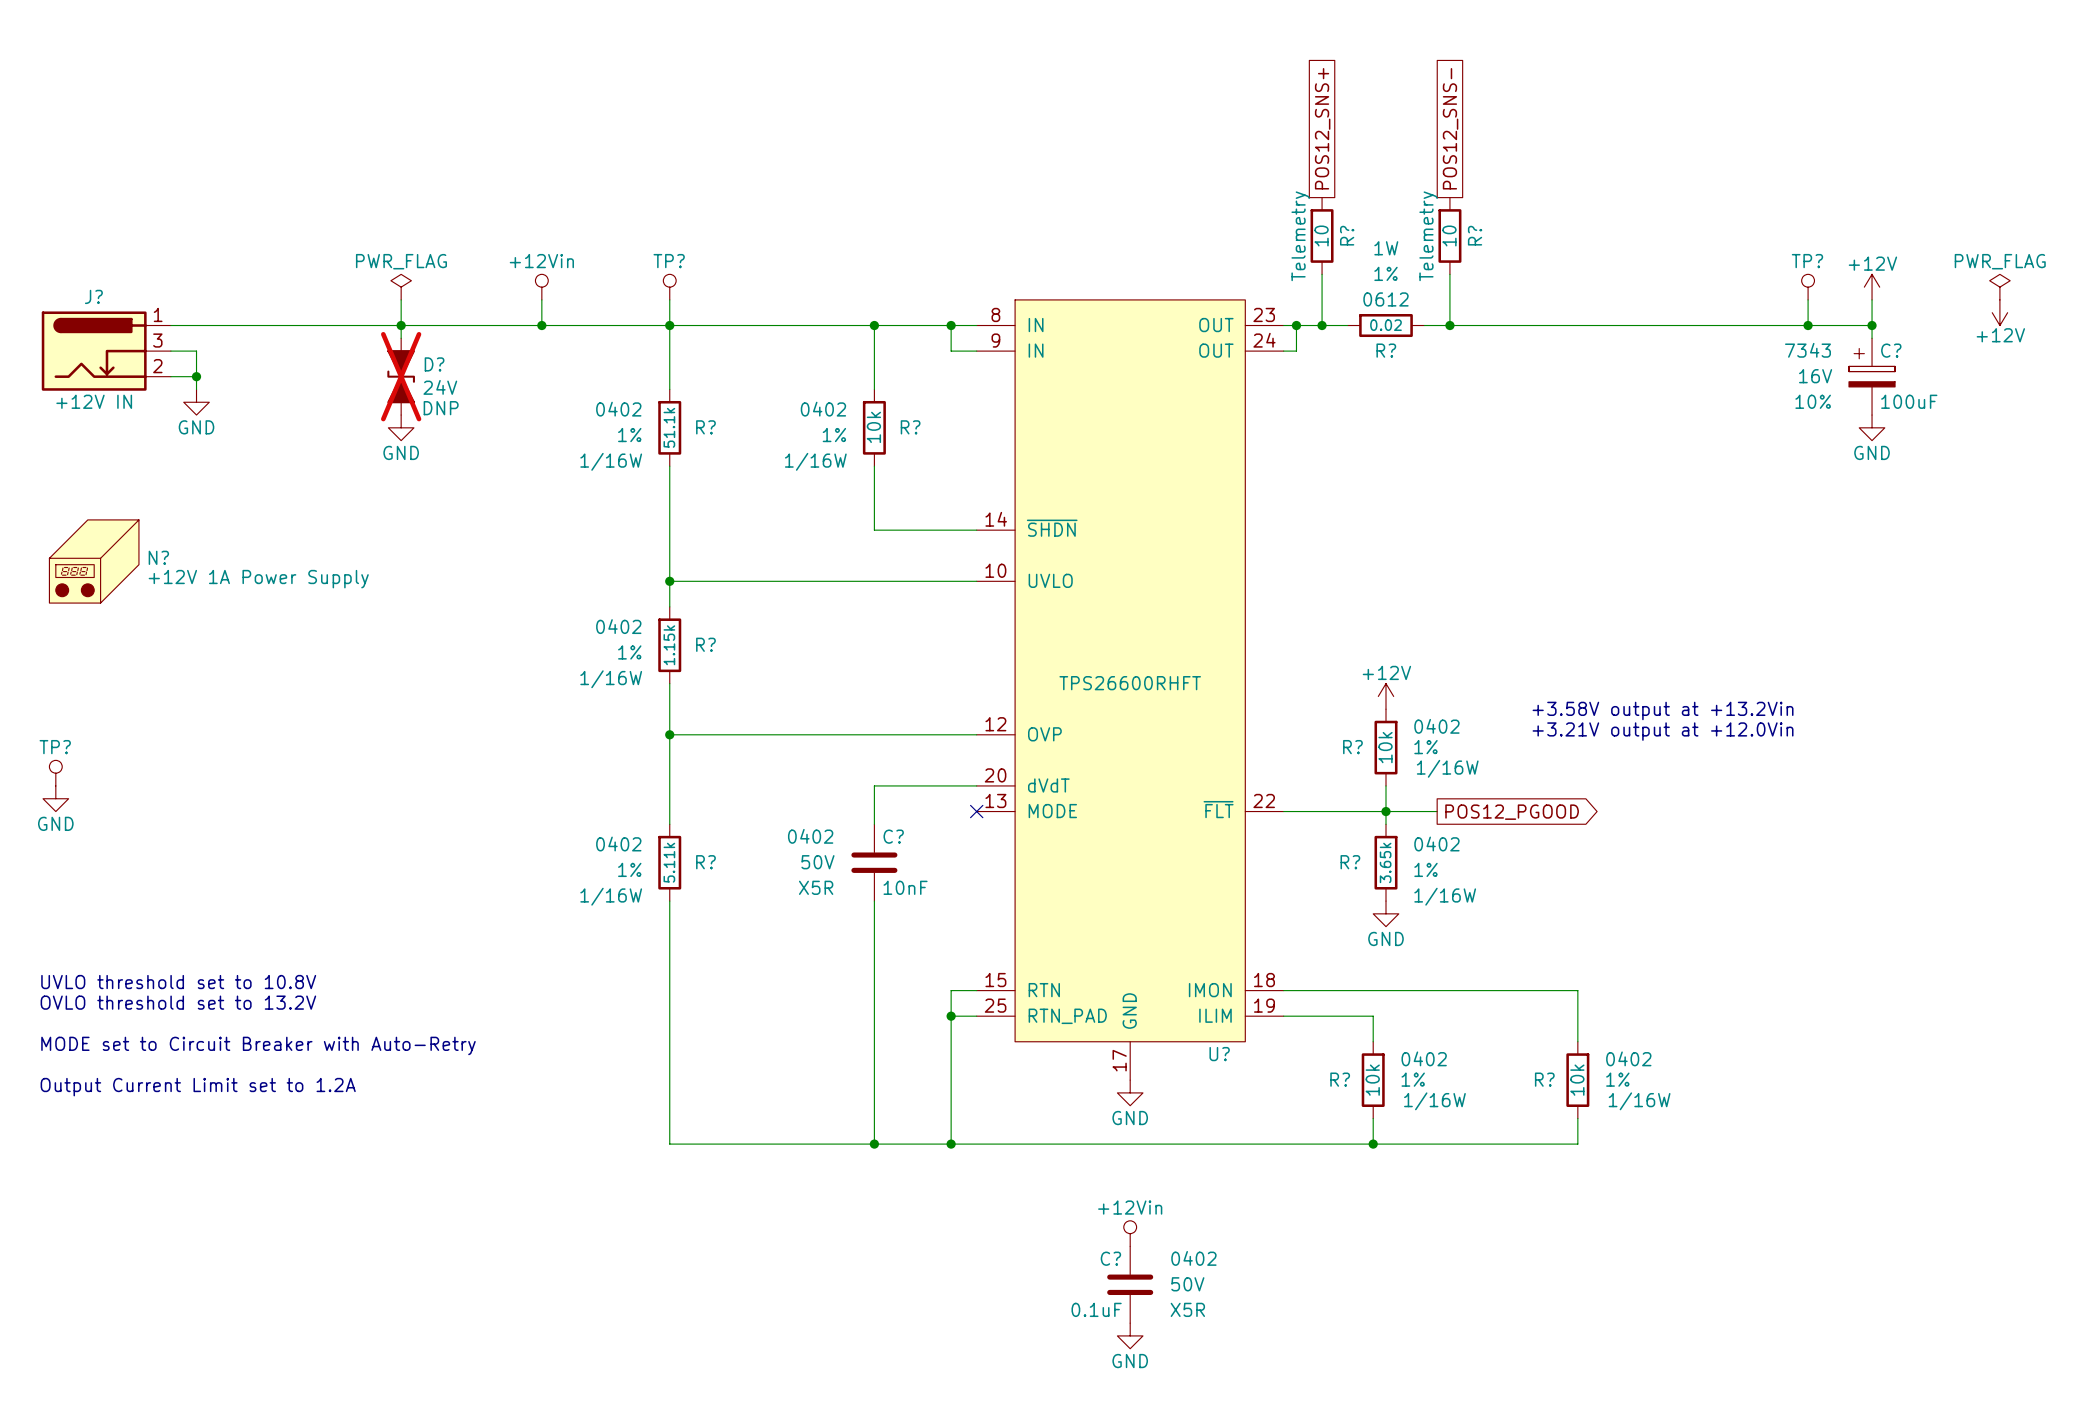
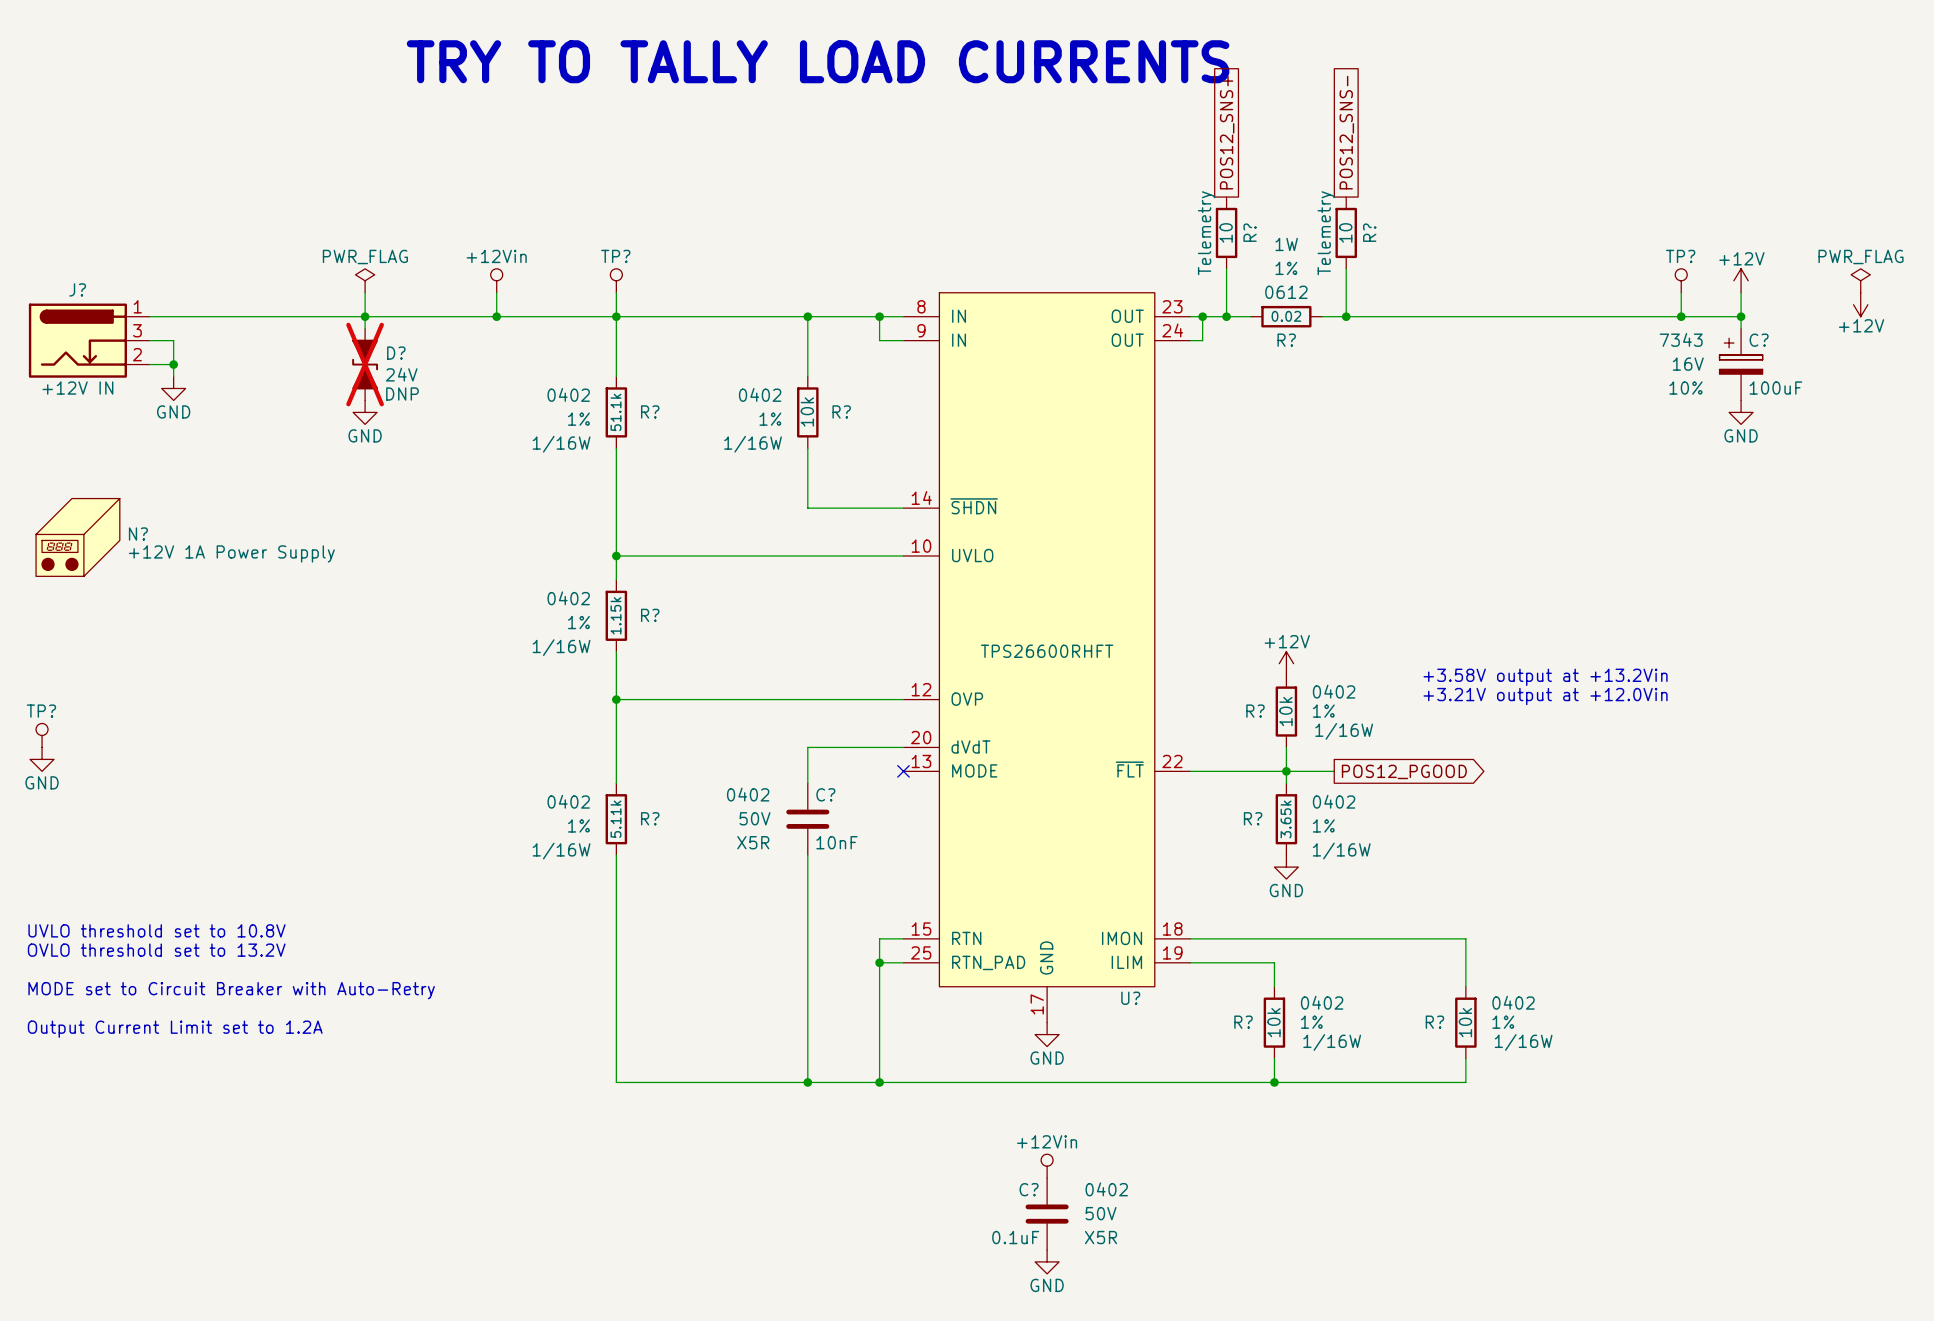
text: none -> TRY TO TALLY LOAD CURRENTS (818, 61)

